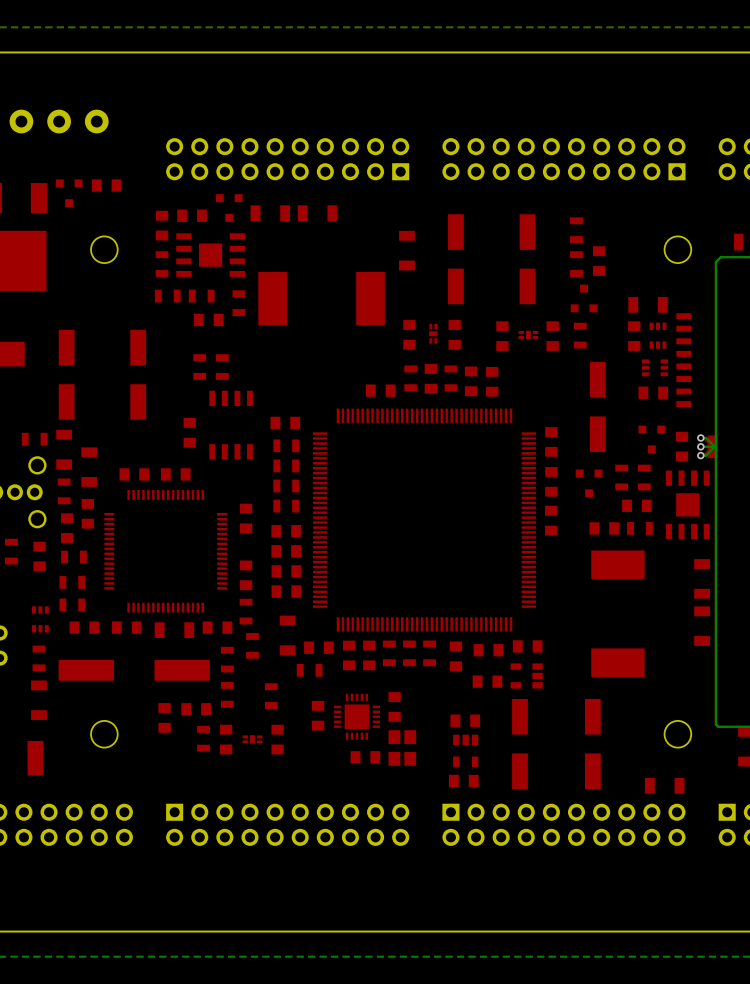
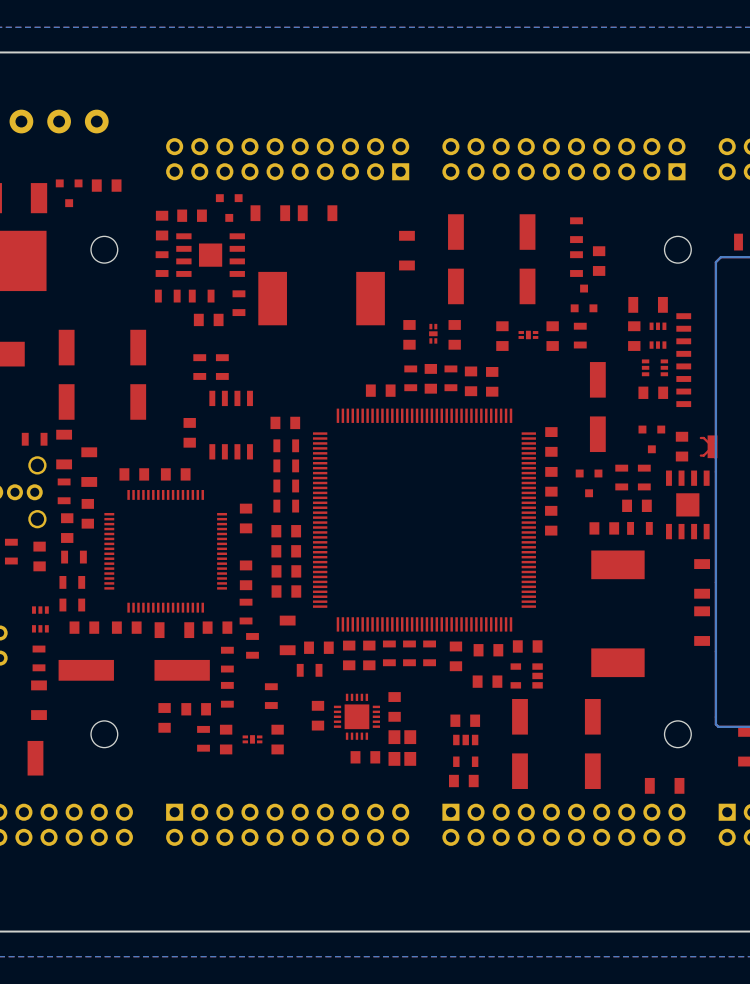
bottom track: (700, 437) (706, 437) (714, 446) (706, 455) (700, 455) -> none
via: (700, 437) -> none
via: (700, 446) -> none
bottom track: (715, 446) (700, 446) -> none
via: (700, 455) -> none

